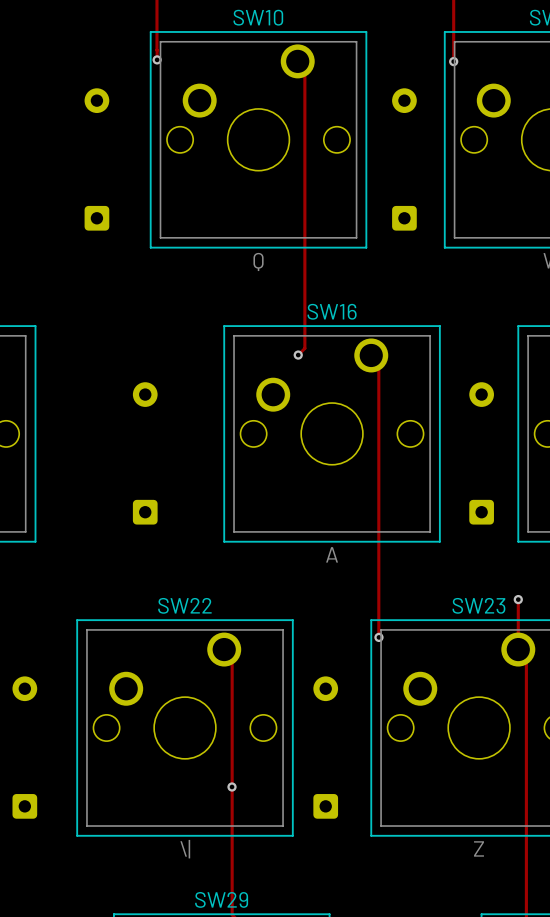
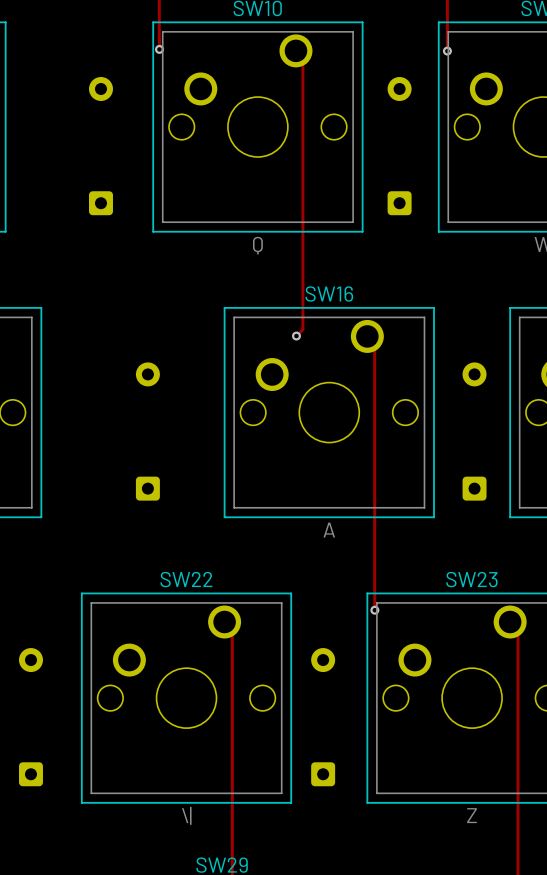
track: (518, 599) (518, 649) -> none
via: (518, 599) -> none
via: (232, 786) -> none

